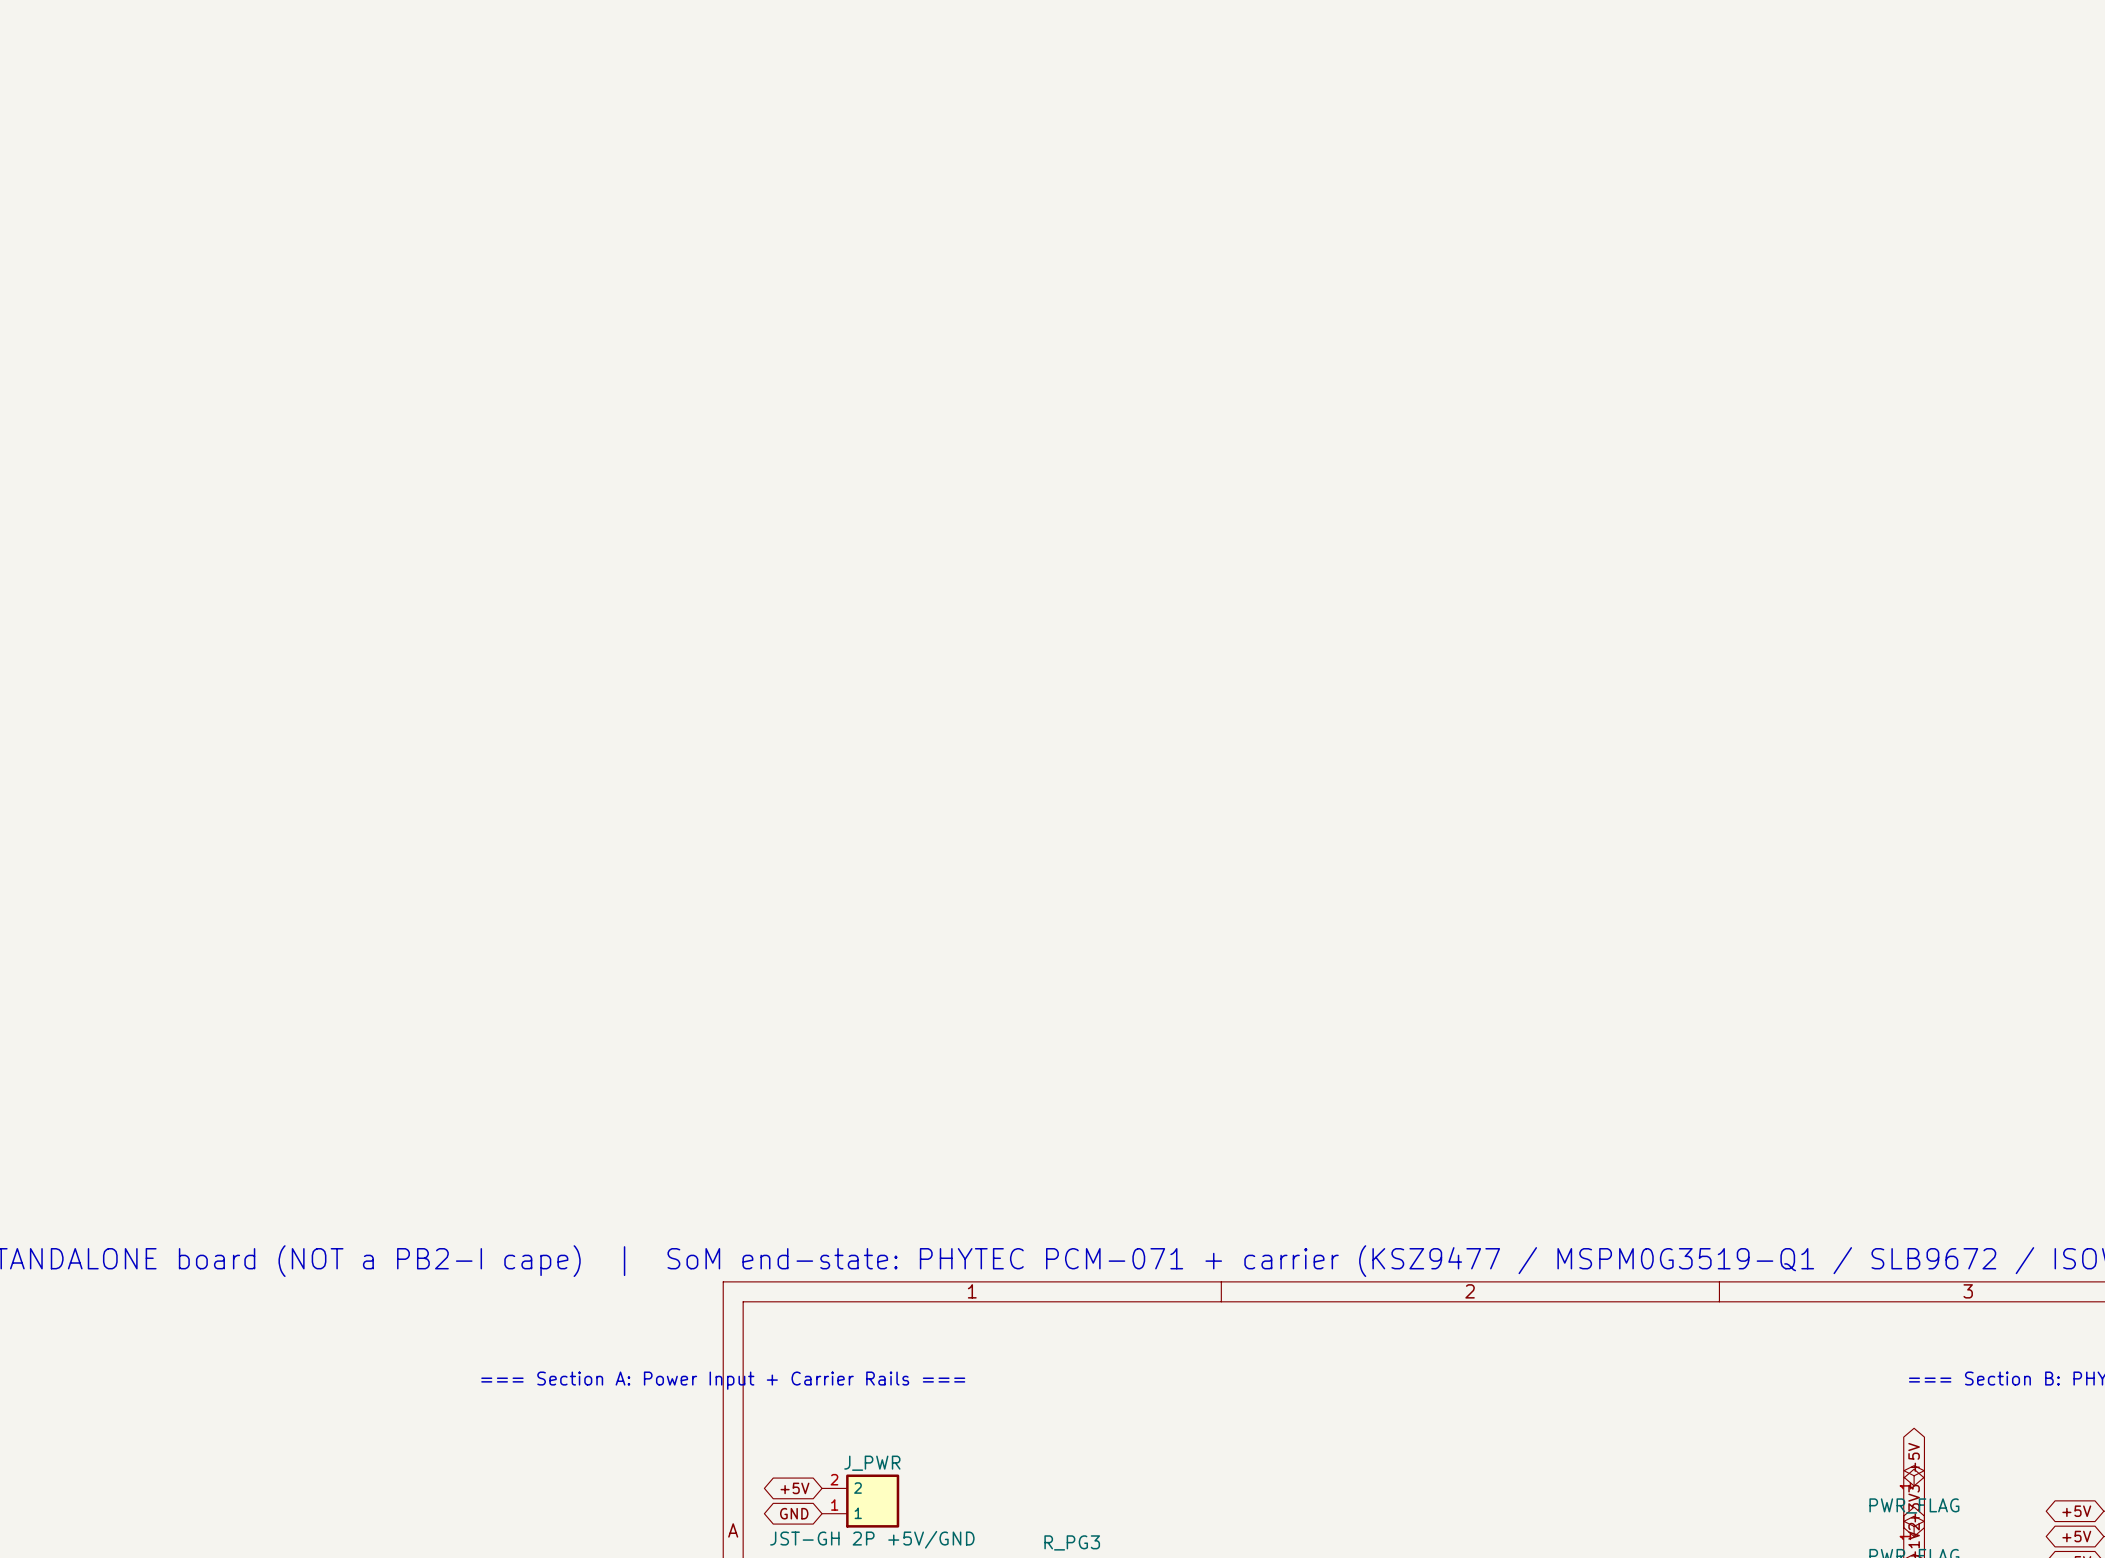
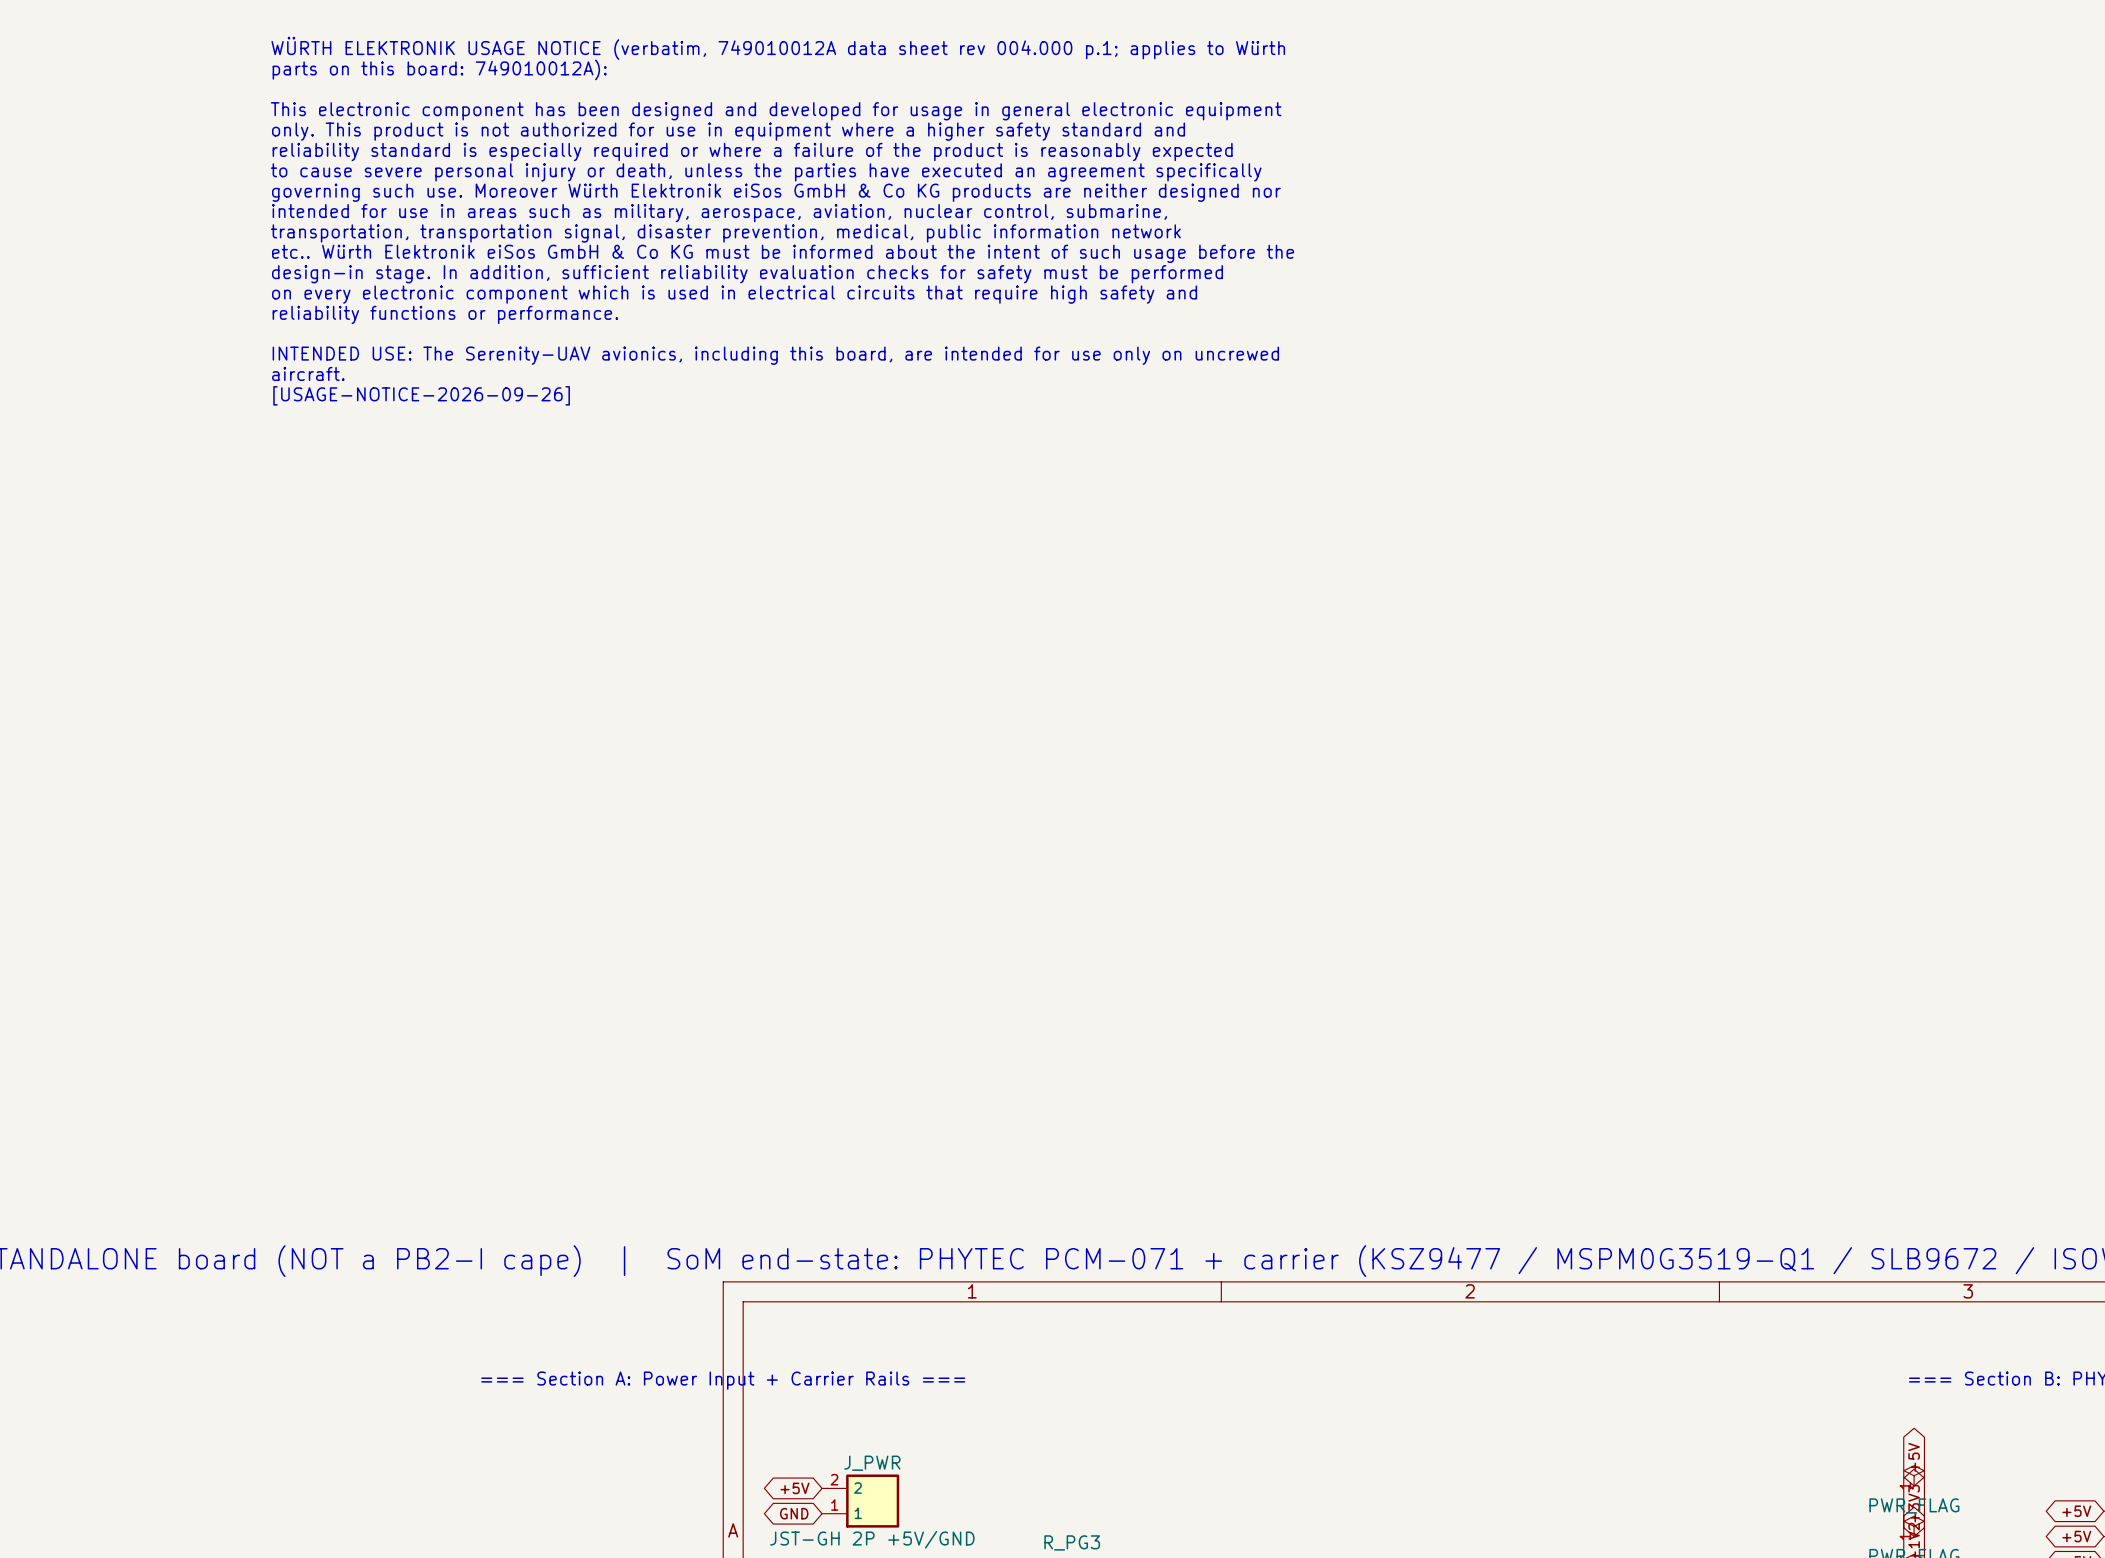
text: none -> WÜRTH ELEKTRONIK USAGE NOTICE (verbatim, 749010012A data sheet rev 004.000 p.1; applies to Würth (778, 48)
text: none -> parts on this board: 749010012A): (439, 69)
text: none -> This electronic component has been designed and developed for usage in general electronic equipment (776, 111)
text: none -> only. This product is not authorized for use in equipment where a higher safety standard and (728, 131)
text: none -> reliability standard is especially required or where a failure of the product is reasonably expected (752, 152)
text: none -> to cause severe personal injury or death, unless the parties have executed an agreement specifically (766, 172)
text: none -> governing such use. Moreover Würth Elektronik eiSos GmbH & Co KG products are neither designed nor (776, 192)
text: none -> intended for use in areas such as military, aerospace, aviation, nuclear control, submarine, (719, 213)
text: none -> transportation, transportation signal, disaster prevention, medical, public information network (725, 233)
text: none -> etc.. Würth Elektronik eiSos GmbH & Co KG must be informed about the intent of such usage before the (783, 253)
text: none -> design-in stage. In addition, sufficient reliability evaluation checks for safety must be performed (747, 274)
text: none -> on every electronic component which is used in electrical circuits that require high safety and (734, 294)
text: none -> reliability functions or performance. (445, 314)
text: none -> INTENDED USE: The Serenity-UAV avionics, including this board, are intended for use only on uncrewed (775, 355)
text: none -> aircraft. (308, 373)
text: none -> [USAGE-NOTICE-2026-09-26] (421, 395)

